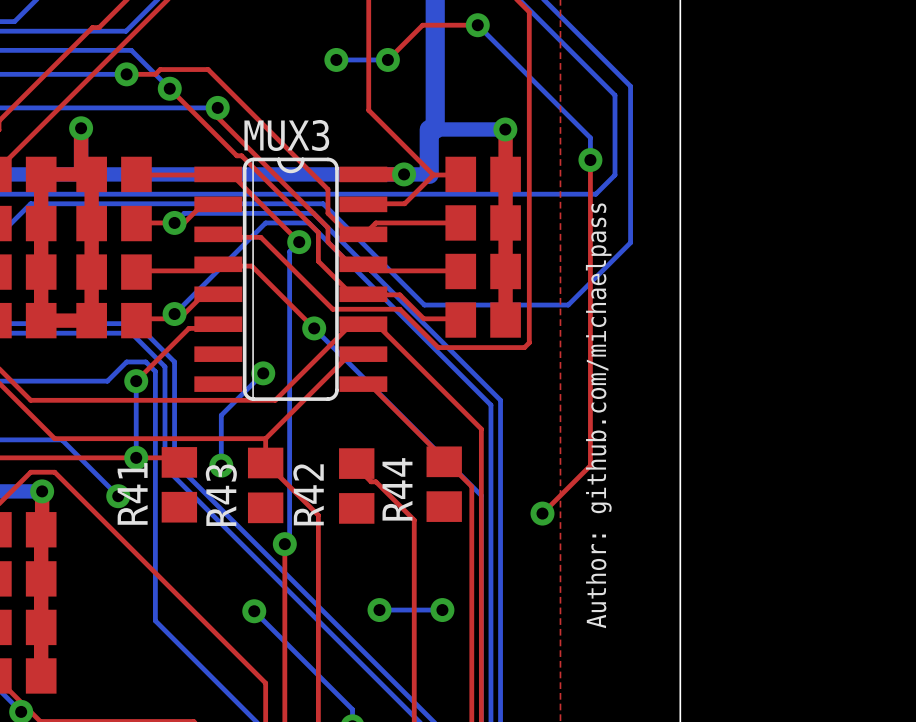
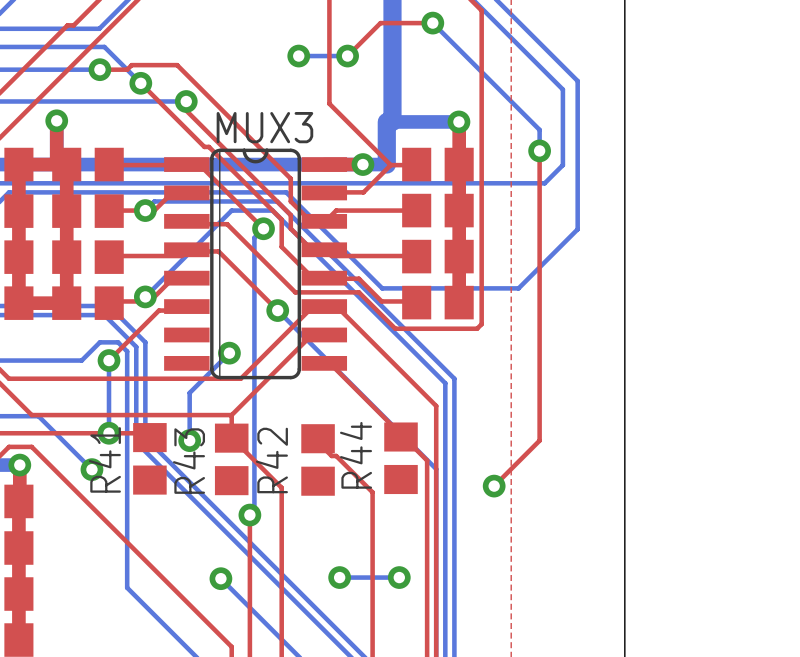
text: Author: github.com/michaelpass (598, 415) -> none

